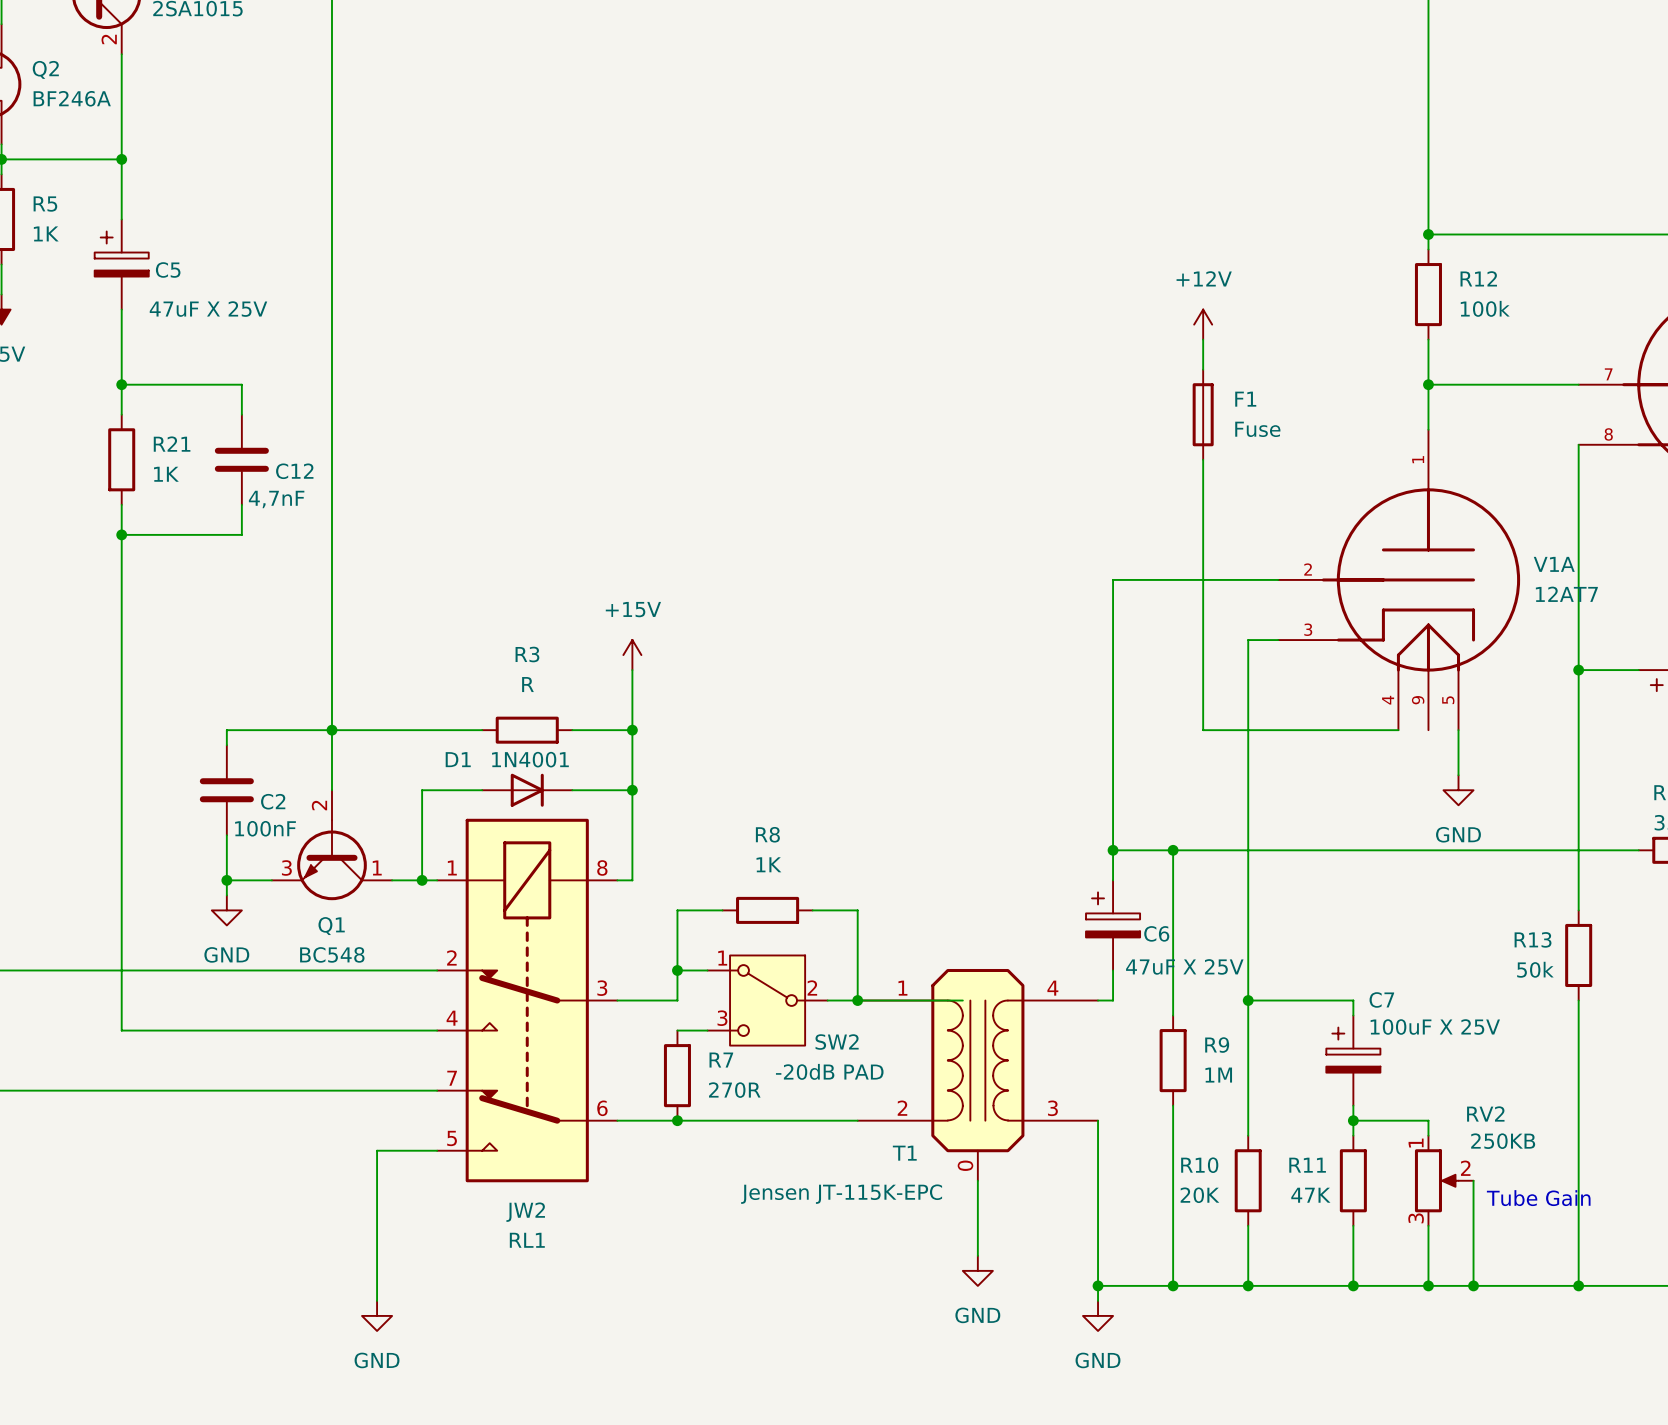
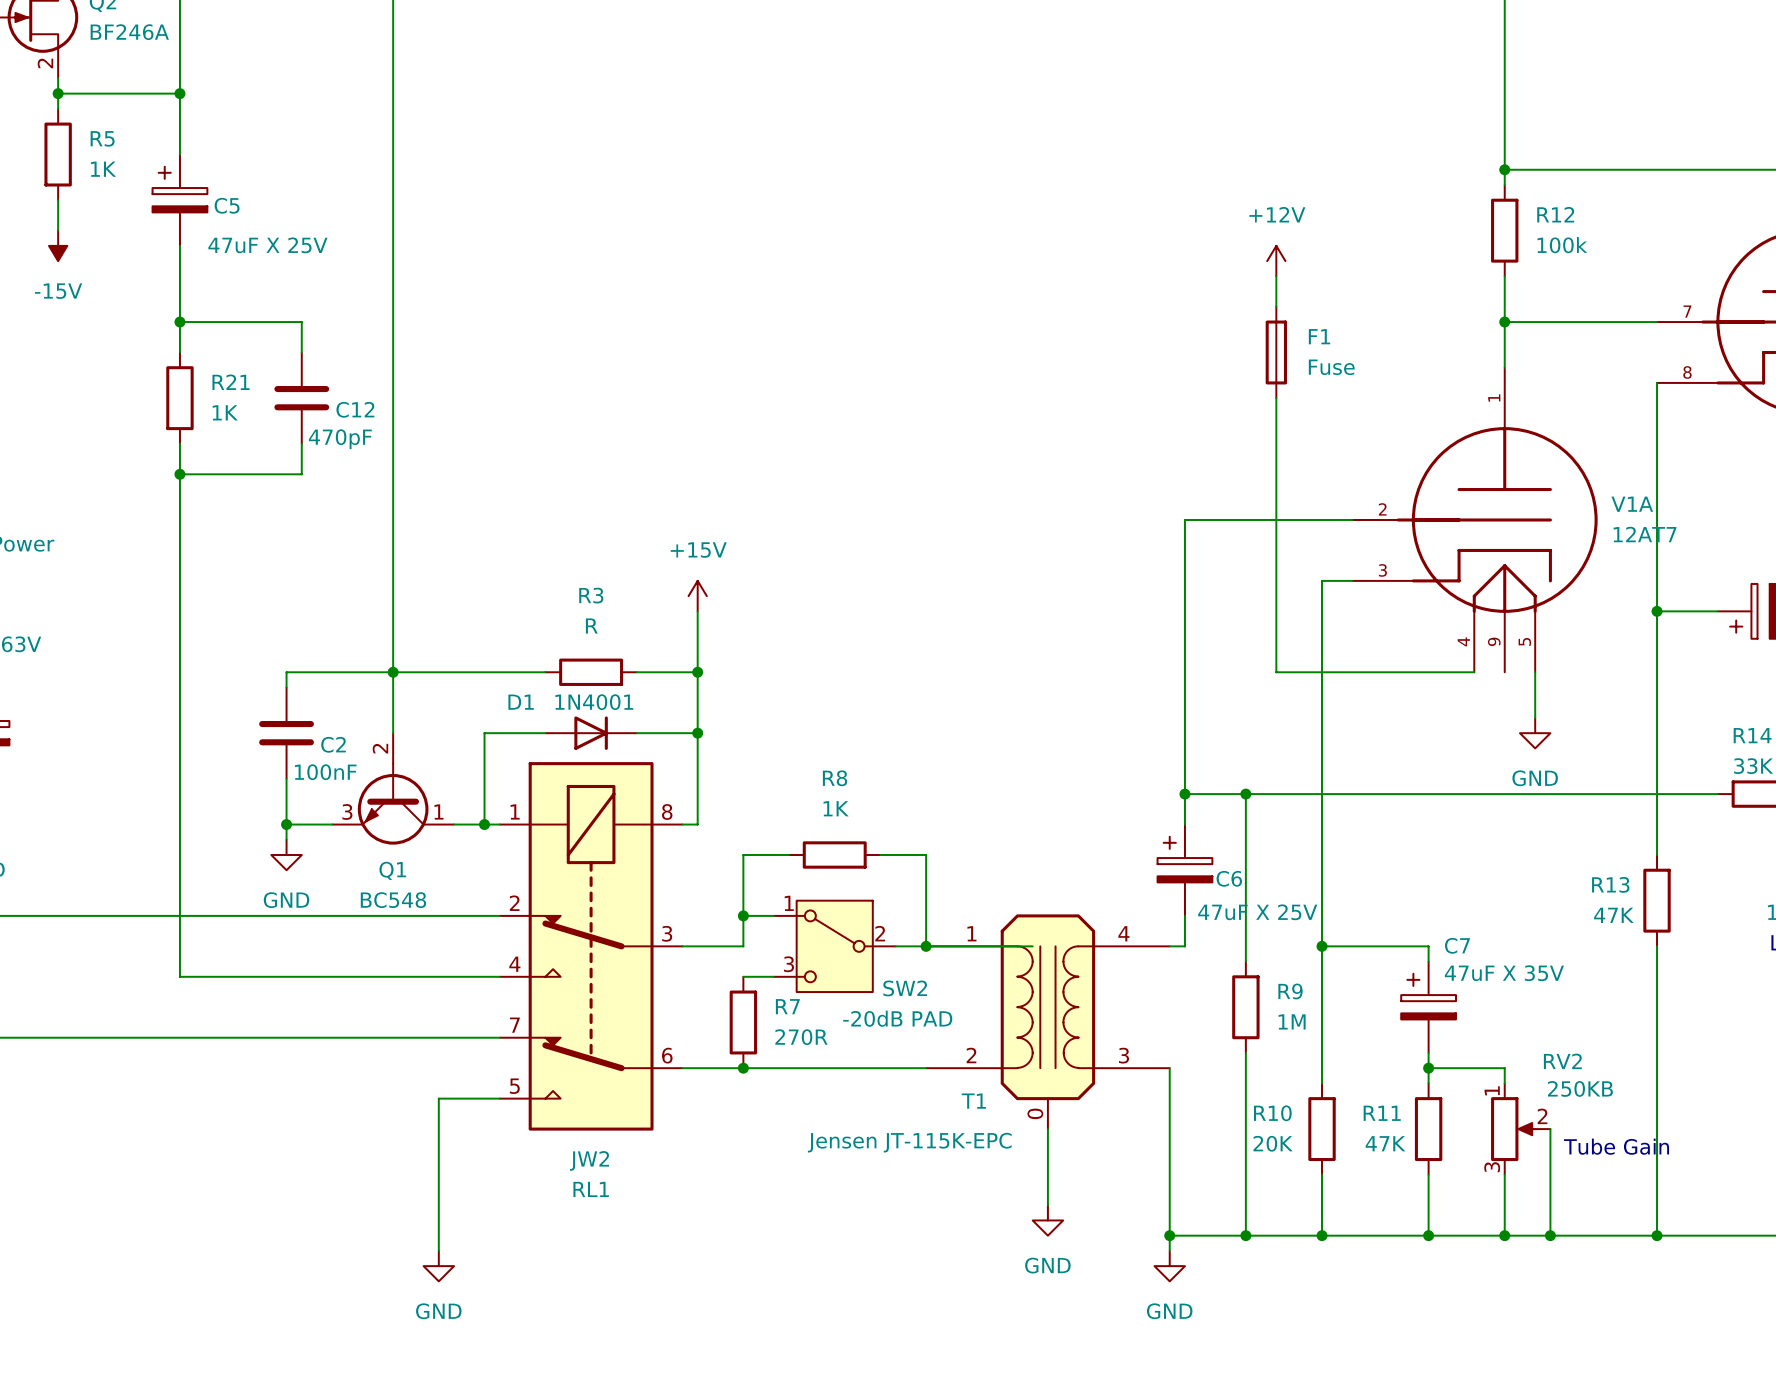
C12 value: 4,7nF (276, 499) -> 470pF (340, 439)
R13 value: 50k (1535, 969) -> 47K (1613, 915)
C7 value: 100uF X 25V (1435, 1027) -> 47uF X 35V (1504, 973)

